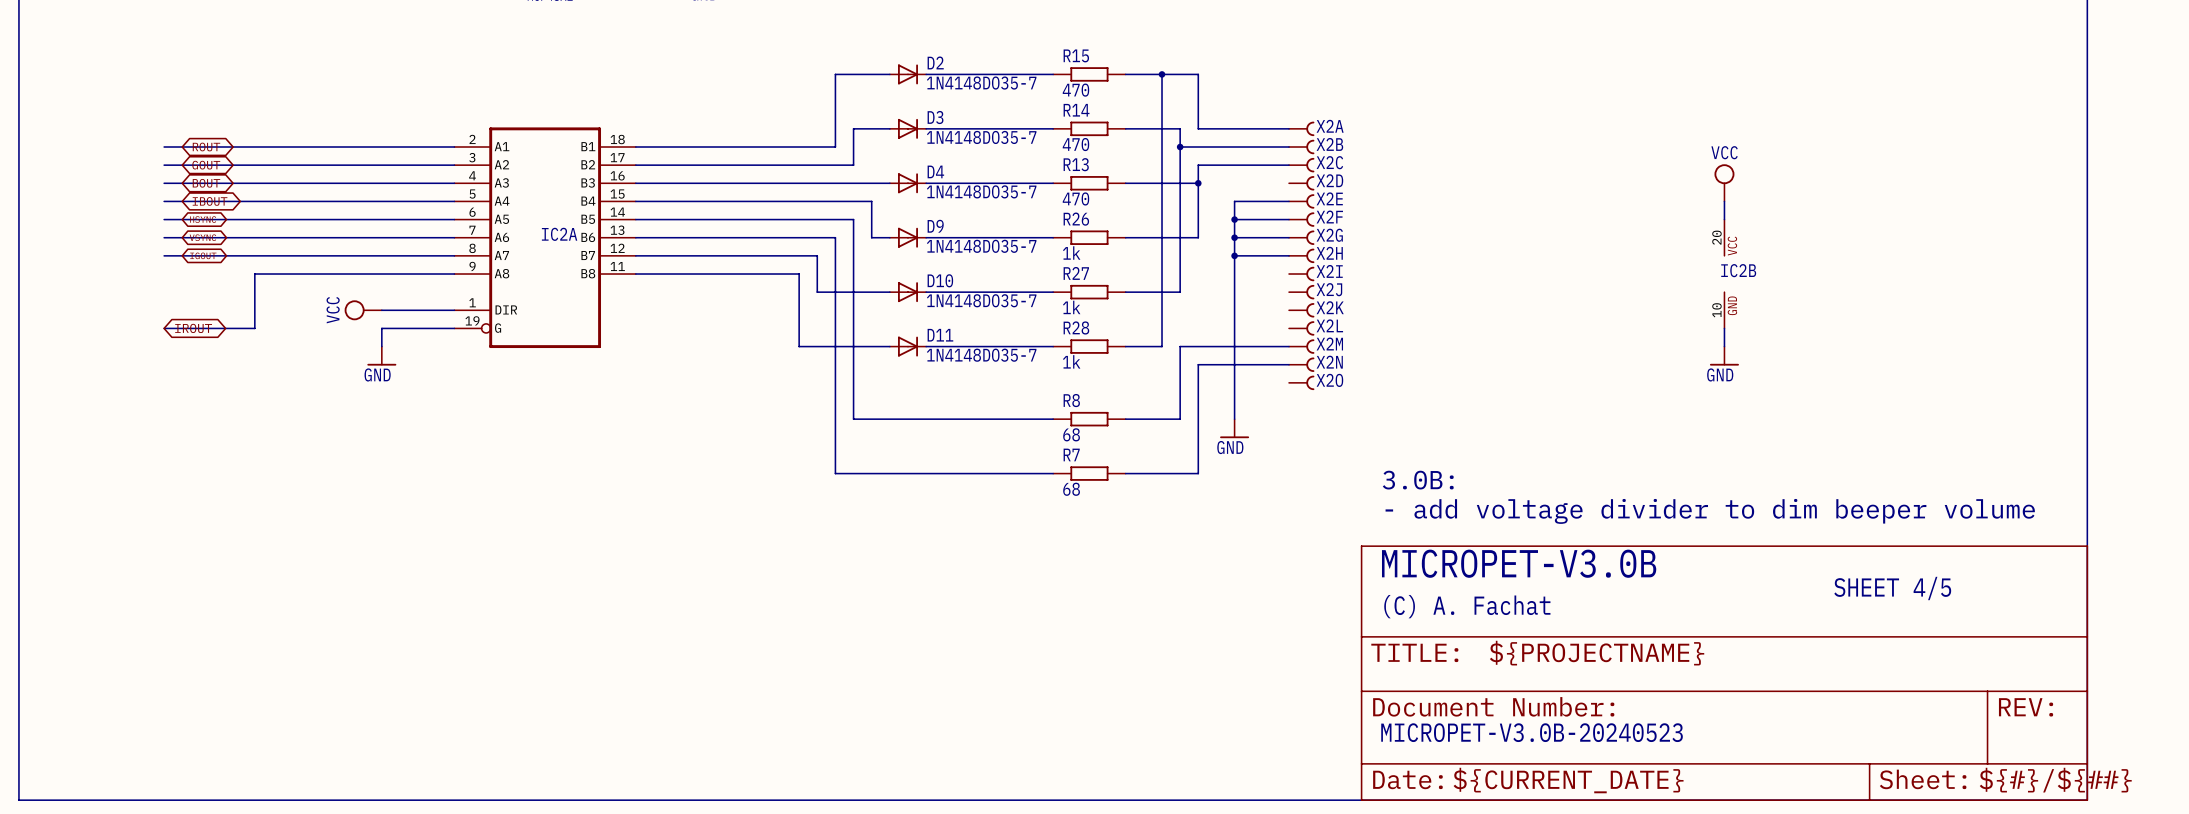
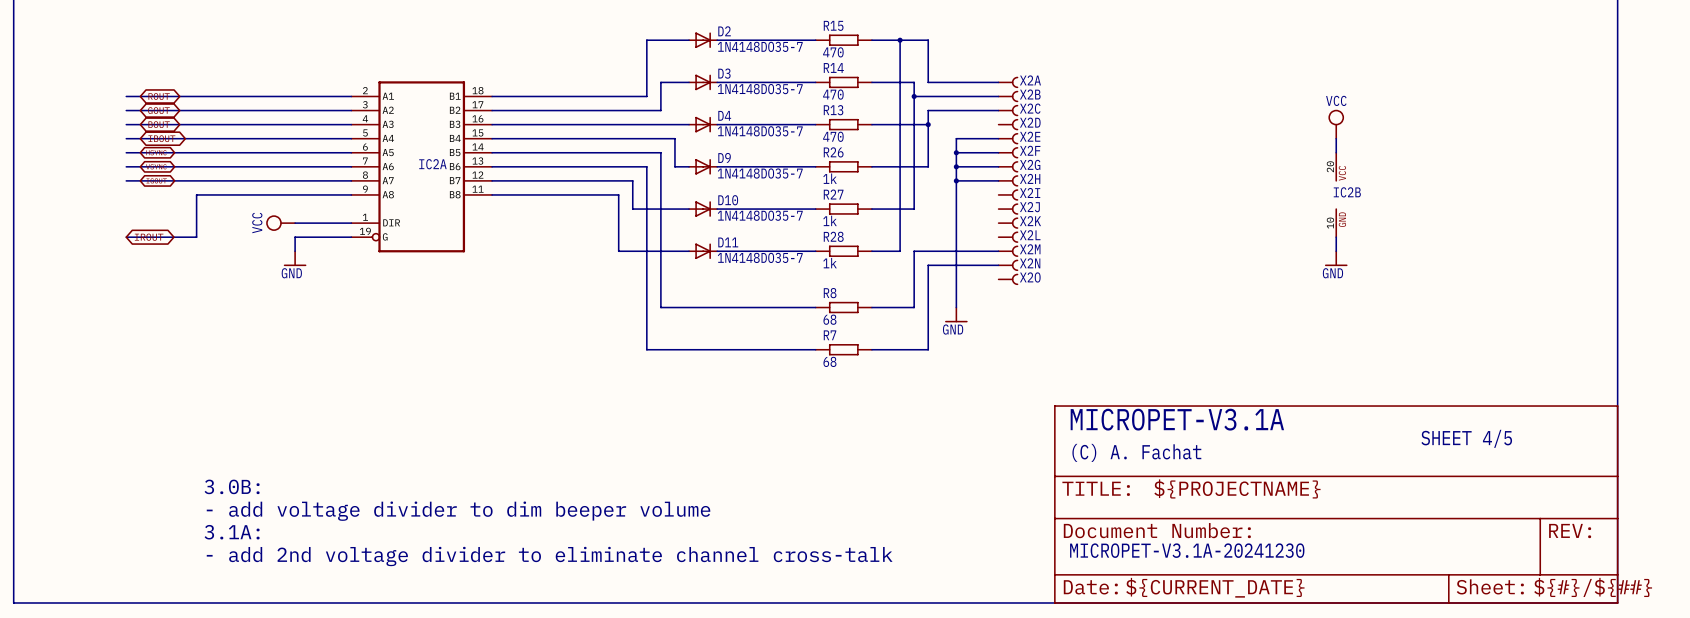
text: 3.0B: (1418, 480) -> none
text: - add voltage divider to dim beeper volume (1710, 511) -> none
text: MICROPET-V3.0B (1519, 563) -> MICROPET-V3.1A (1177, 419)
text: none -> 3.0B: (232, 486)
text: none -> - add voltage divider to dim beeper volume (458, 511)
text: none -> 3.1A: (232, 532)
text: MICROPET-V3.0B-20240523 (1532, 732) -> MICROPET-V3.1A-20241230 (1187, 550)
text: none -> - add 2nd voltage divider to eliminate channel cross-talk (549, 556)

